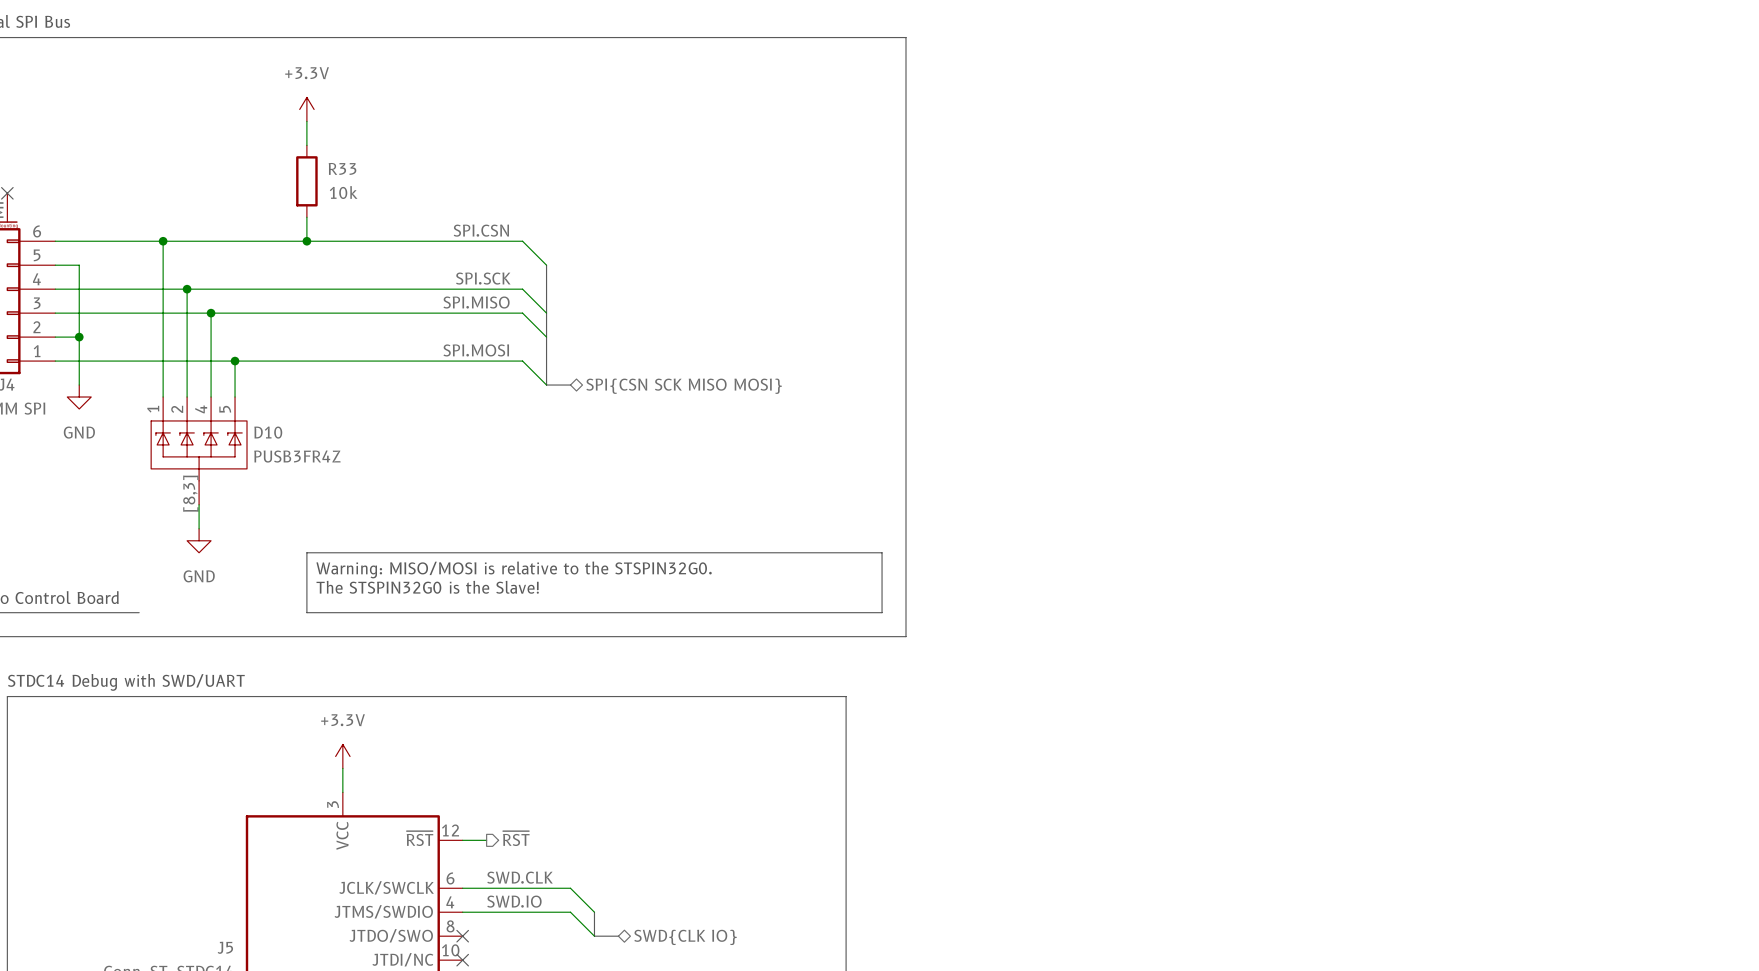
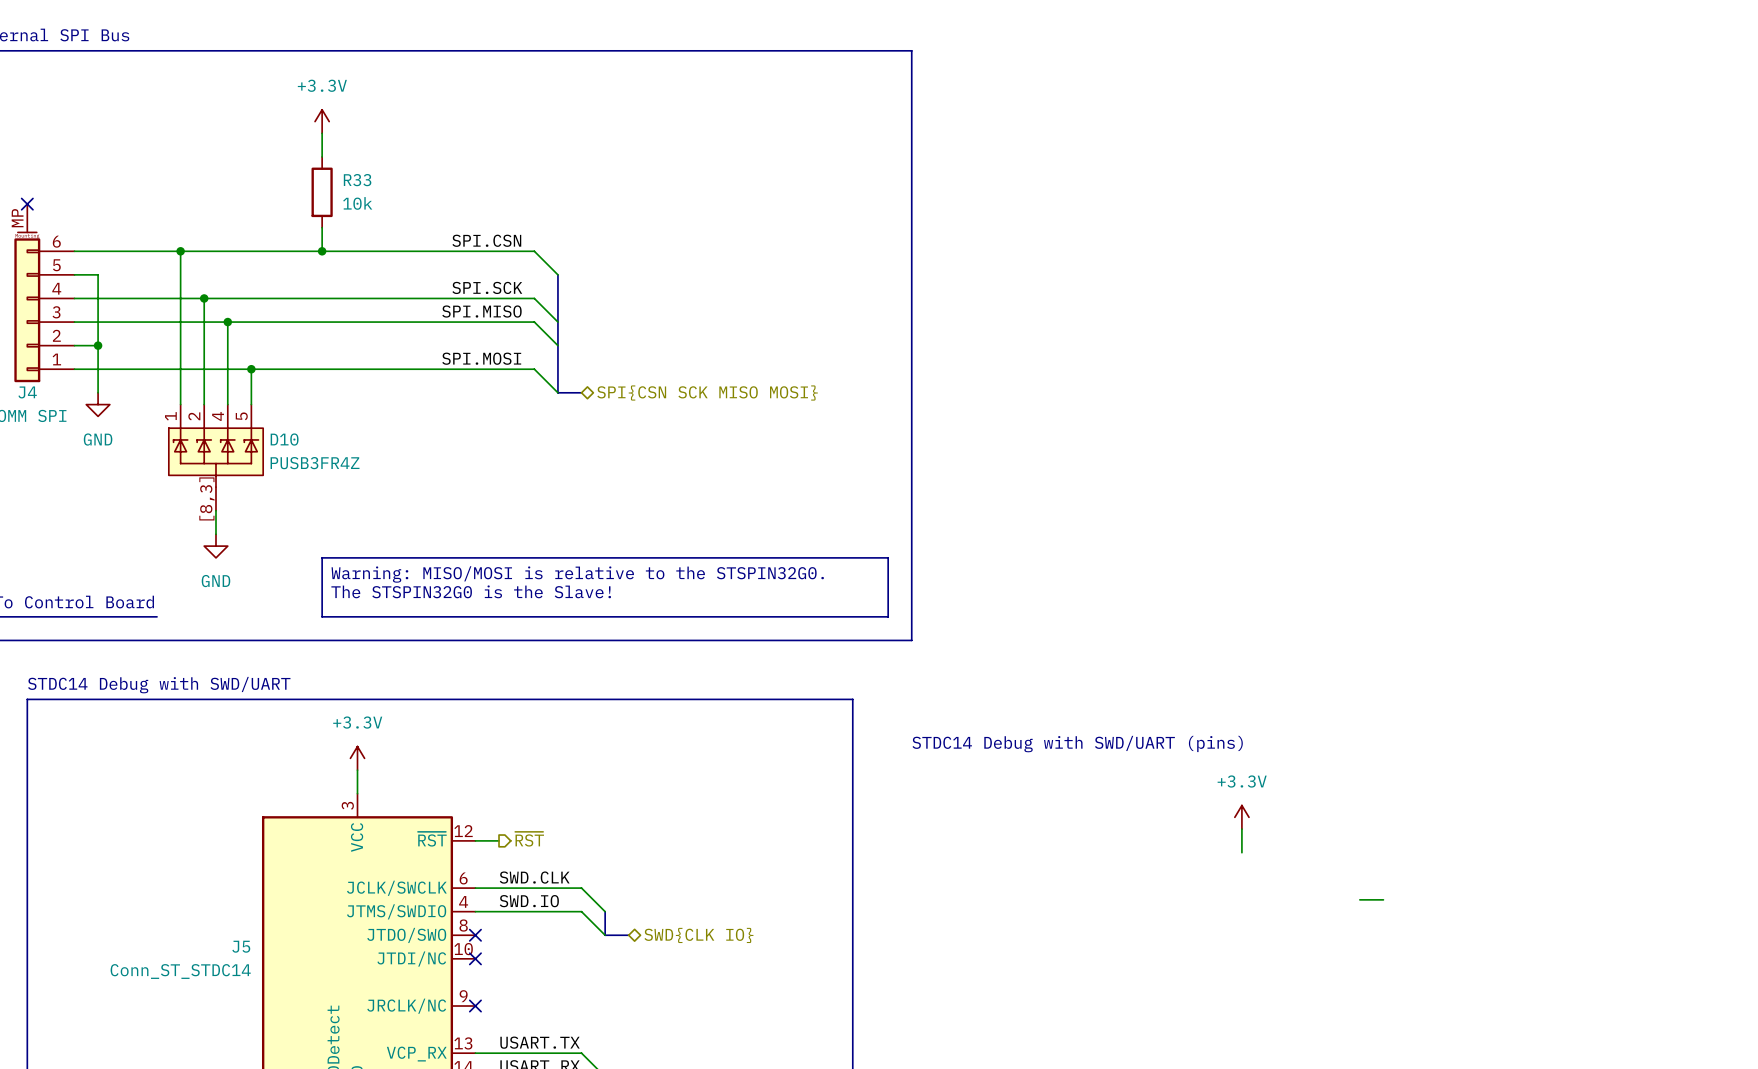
text: none -> STDC14 Debug with SWD/UART (pins) (1077, 744)
power symbol: none -> +3.3V (1241, 817)
wire: none -> (1241, 829) (1241, 852)
wire: none -> (1359, 899) (1383, 899)

